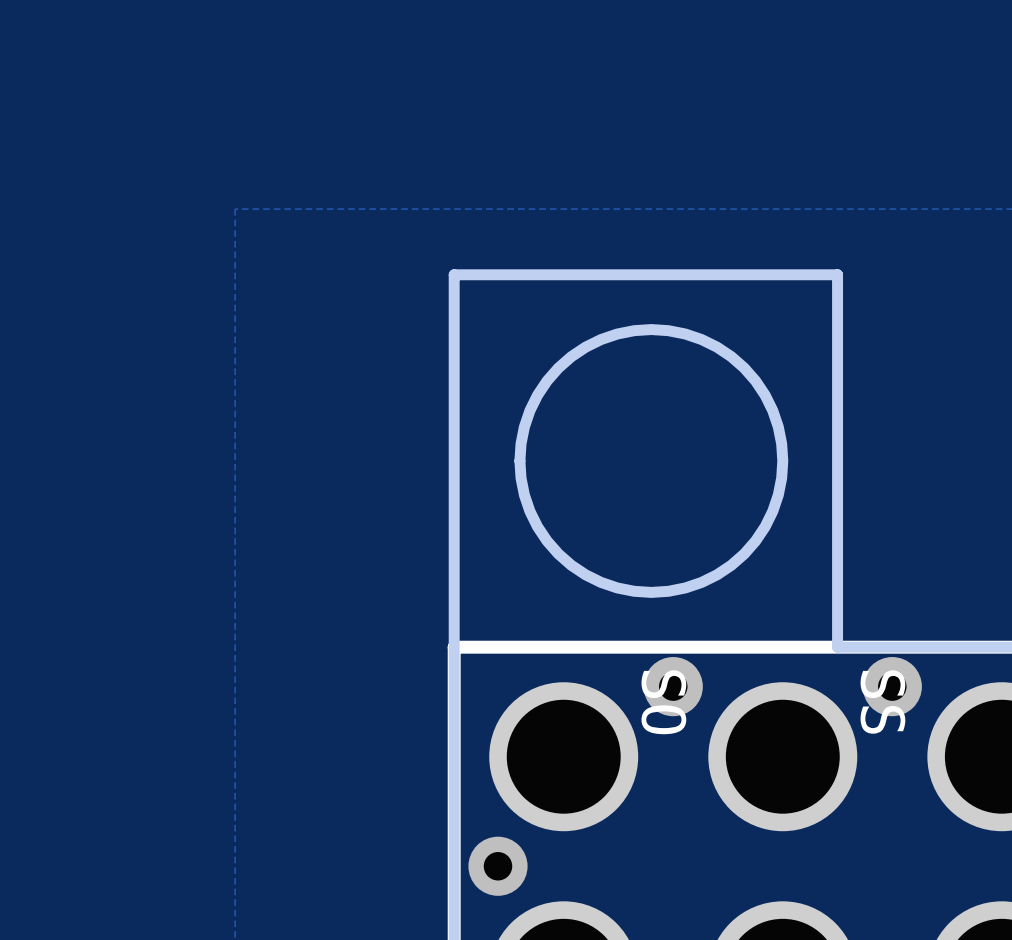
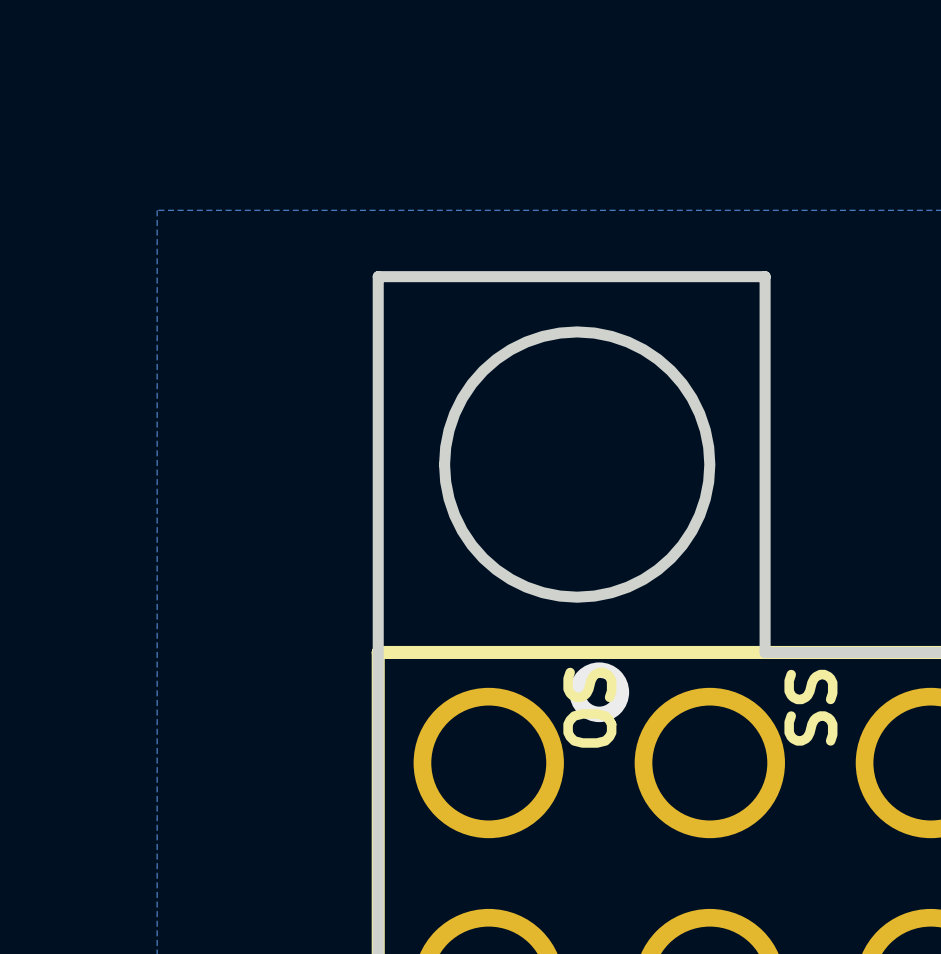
via: (892, 686) -> none
via: (498, 866) -> none

